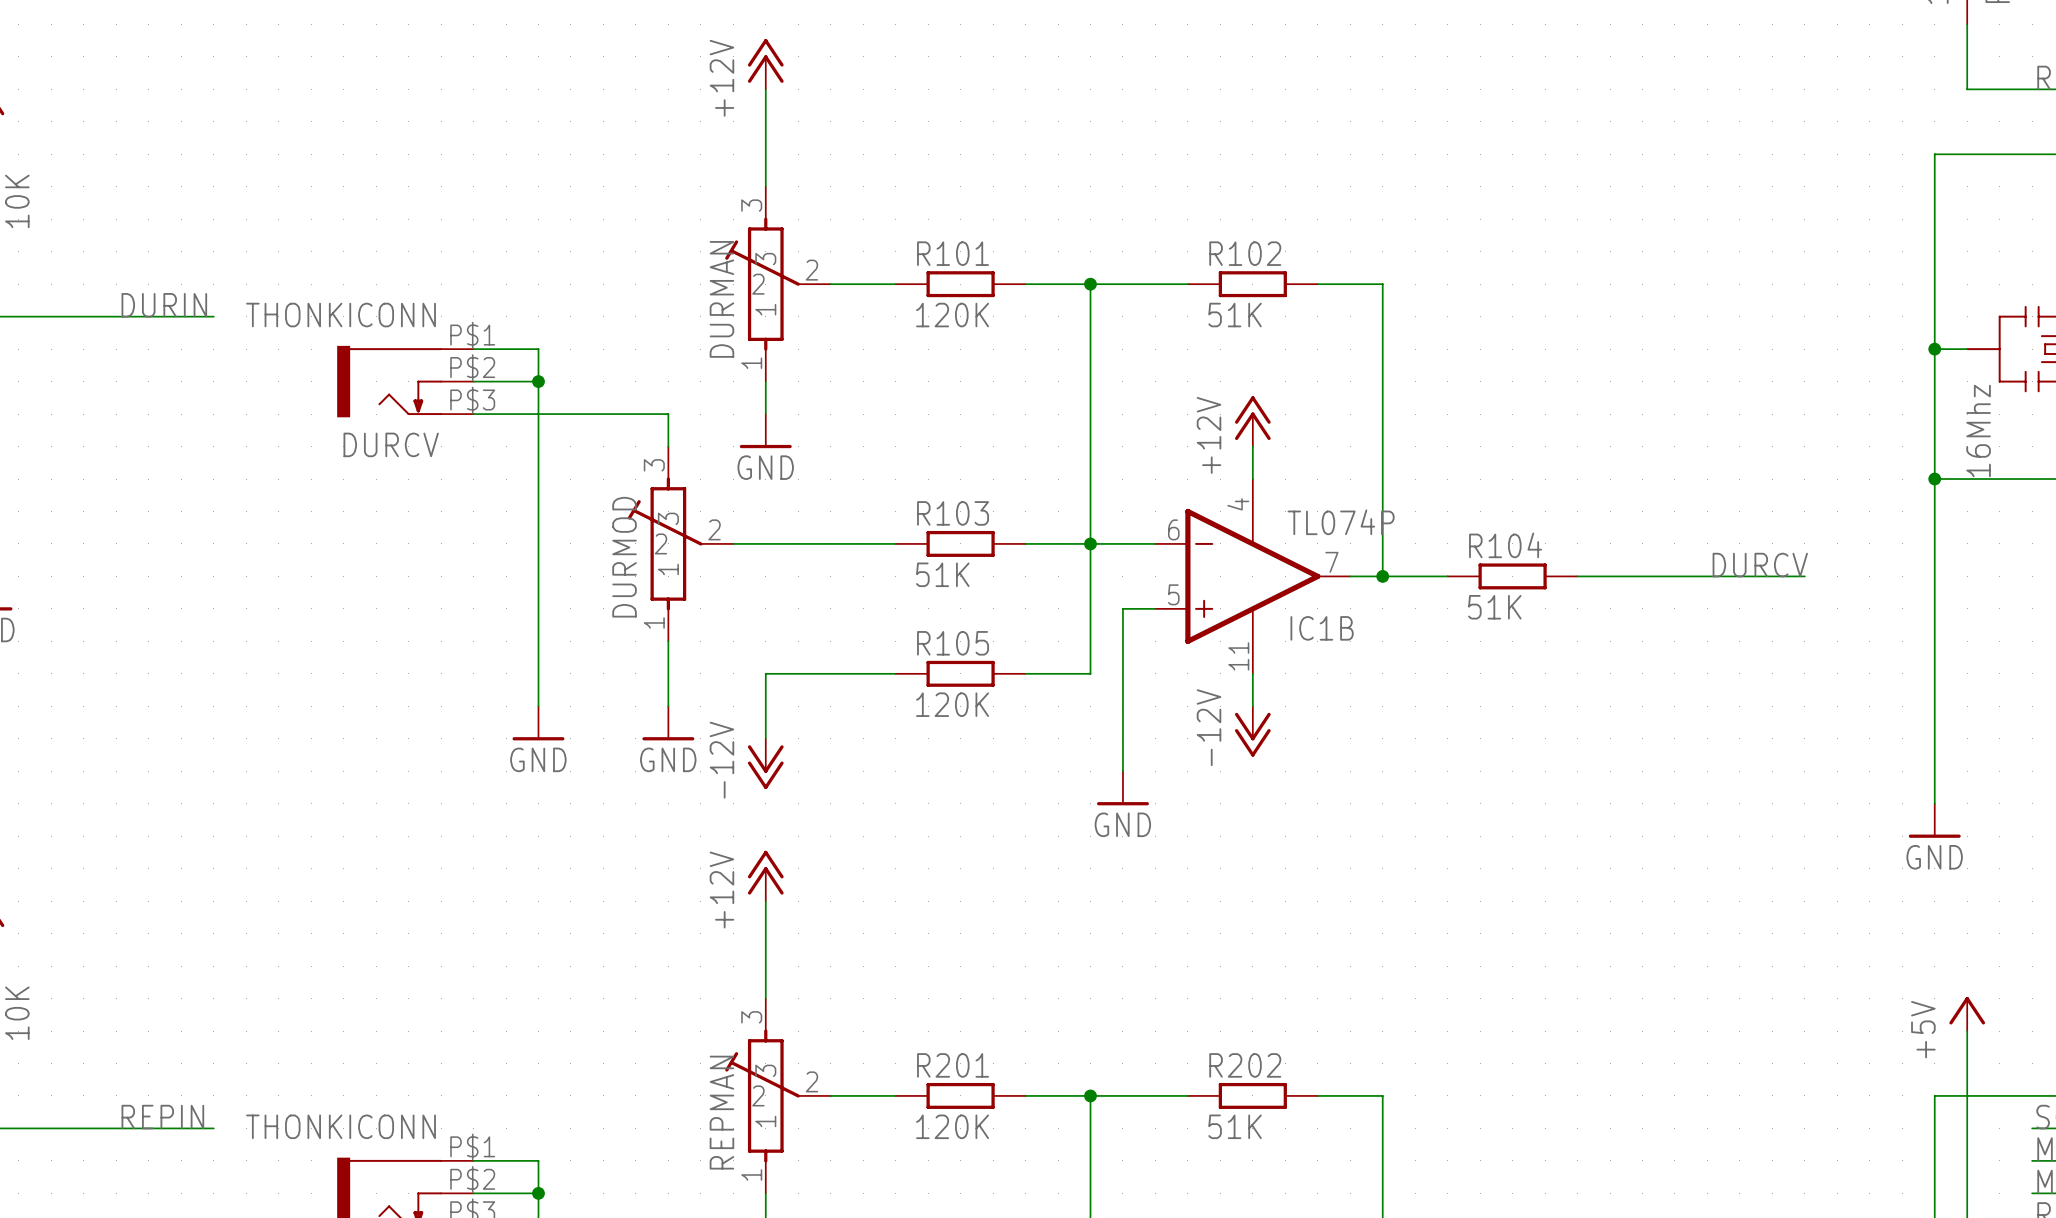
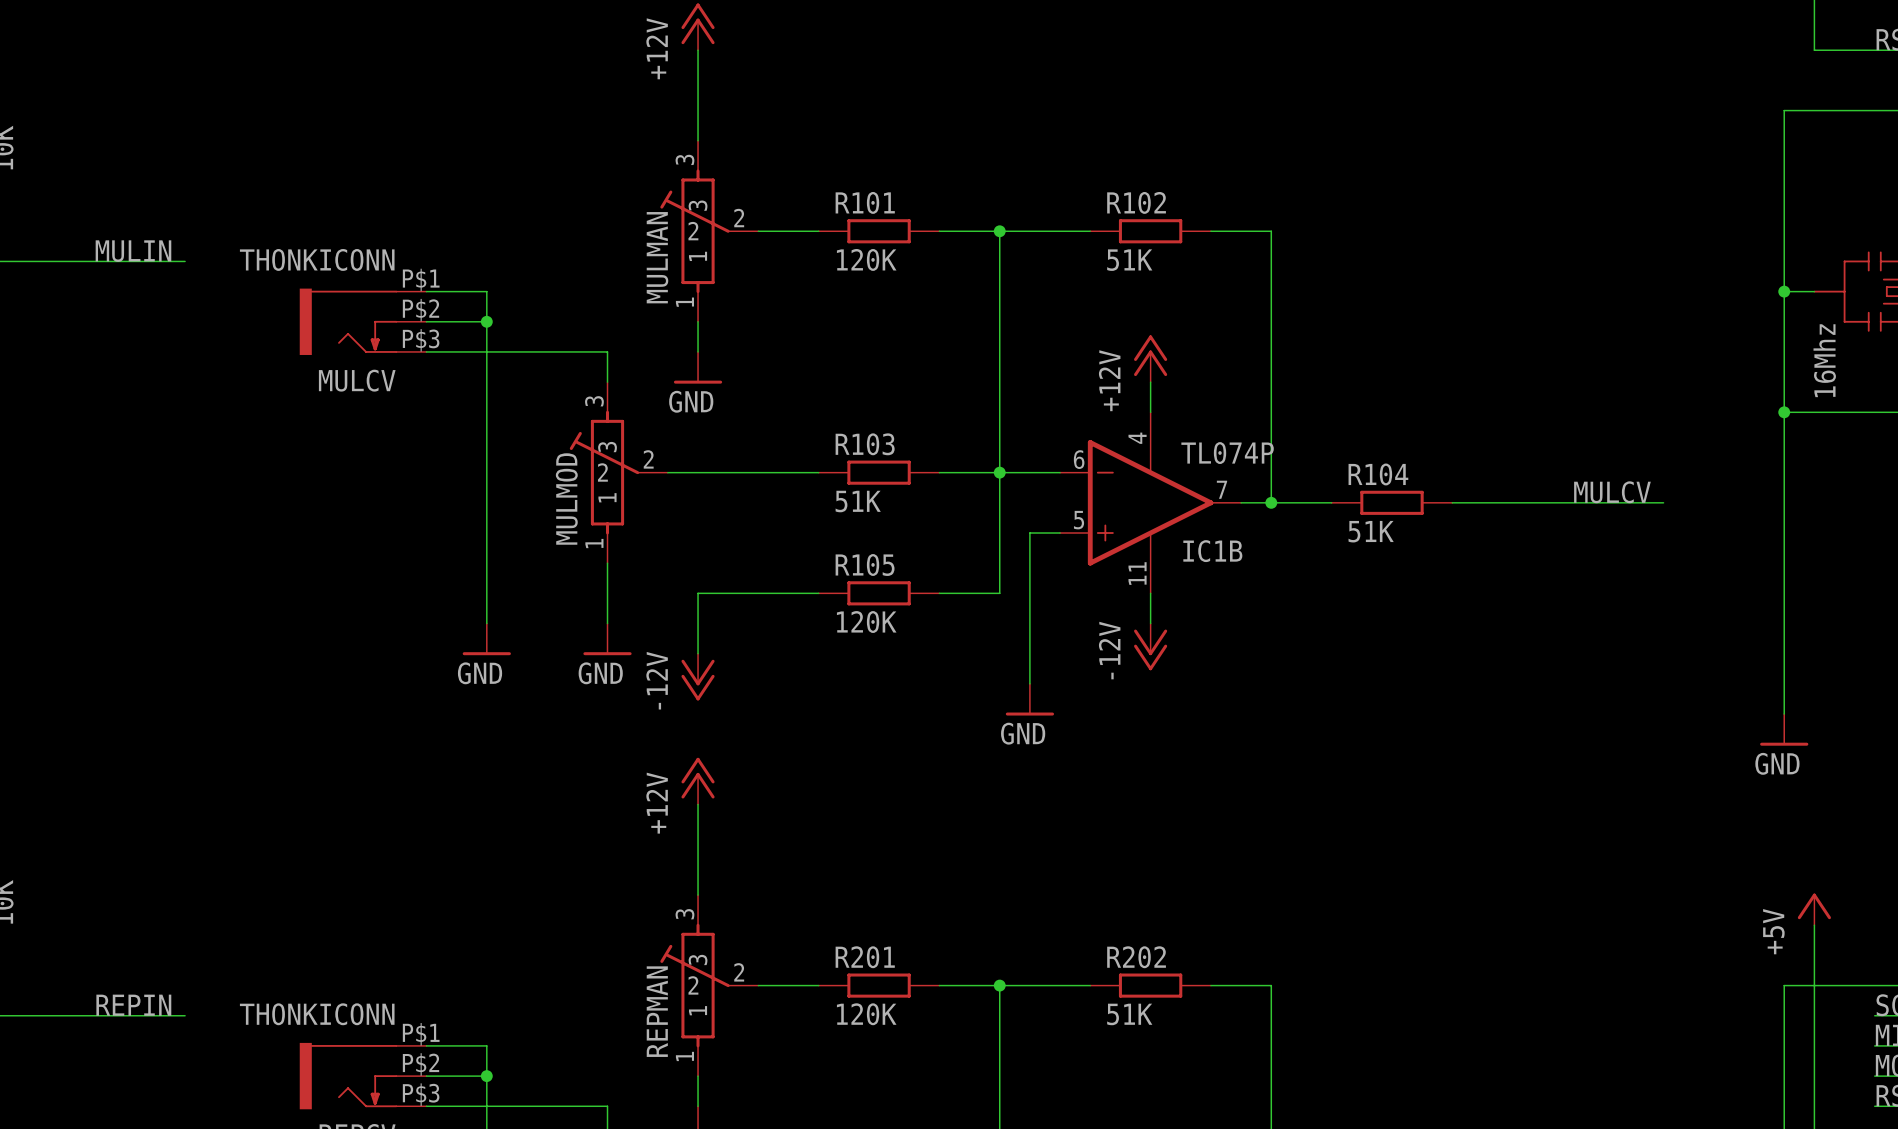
DURMAN name: DURMAN (721, 299) -> MULMAN (657, 257)
label: DURIN (164, 305) -> MULIN (133, 251)
DURCV name: DURCV (391, 444) -> MULCV (357, 380)
DURMOD name: DURMOD (624, 557) -> MULMOD (566, 498)
label: DURCV (1760, 565) -> MULCV (1612, 492)

